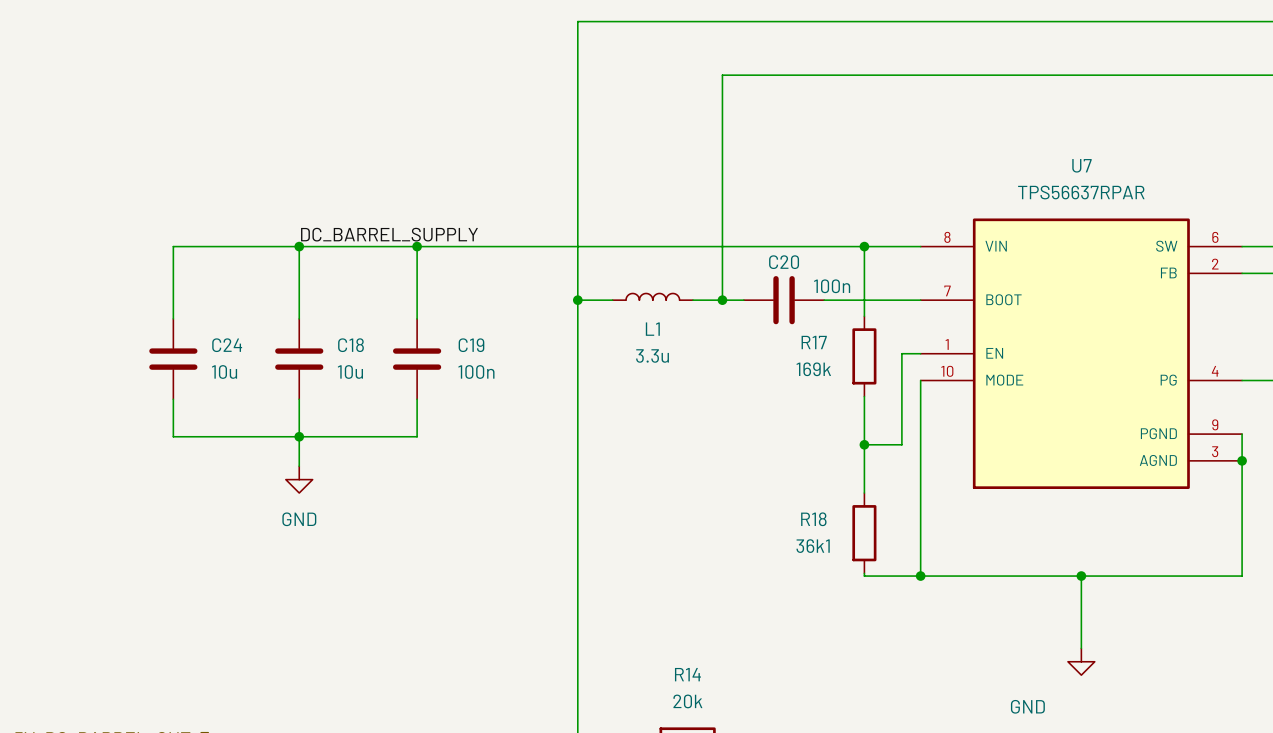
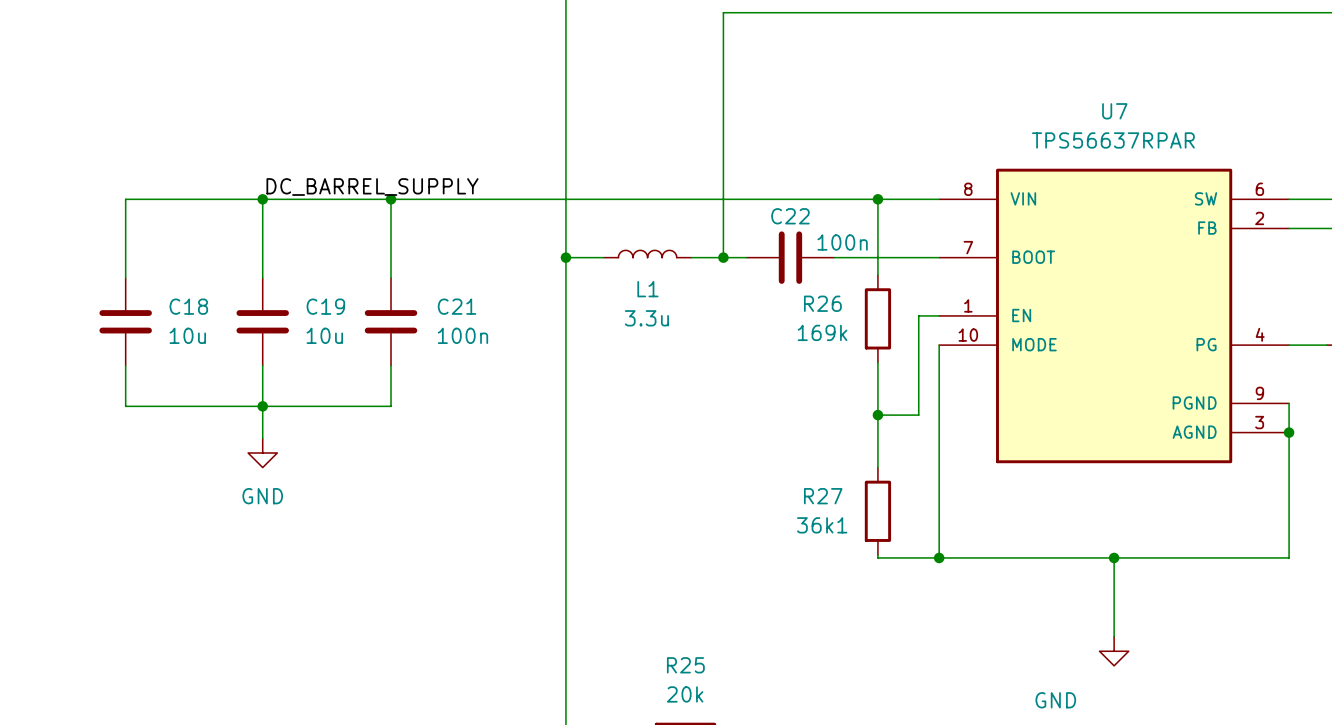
C20 name: C20 (784, 262) -> C22 (790, 216)
R17 name: R17 (814, 342) -> R26 (822, 303)
C24 name: C24 (227, 345) -> C18 (188, 306)
C18 name: C18 (350, 345) -> C19 (325, 306)
C19 name: C19 (471, 345) -> C21 (457, 306)
R18 name: R18 (813, 519) -> R27 (823, 496)
R14 name: R14 (687, 674) -> R25 (685, 665)

